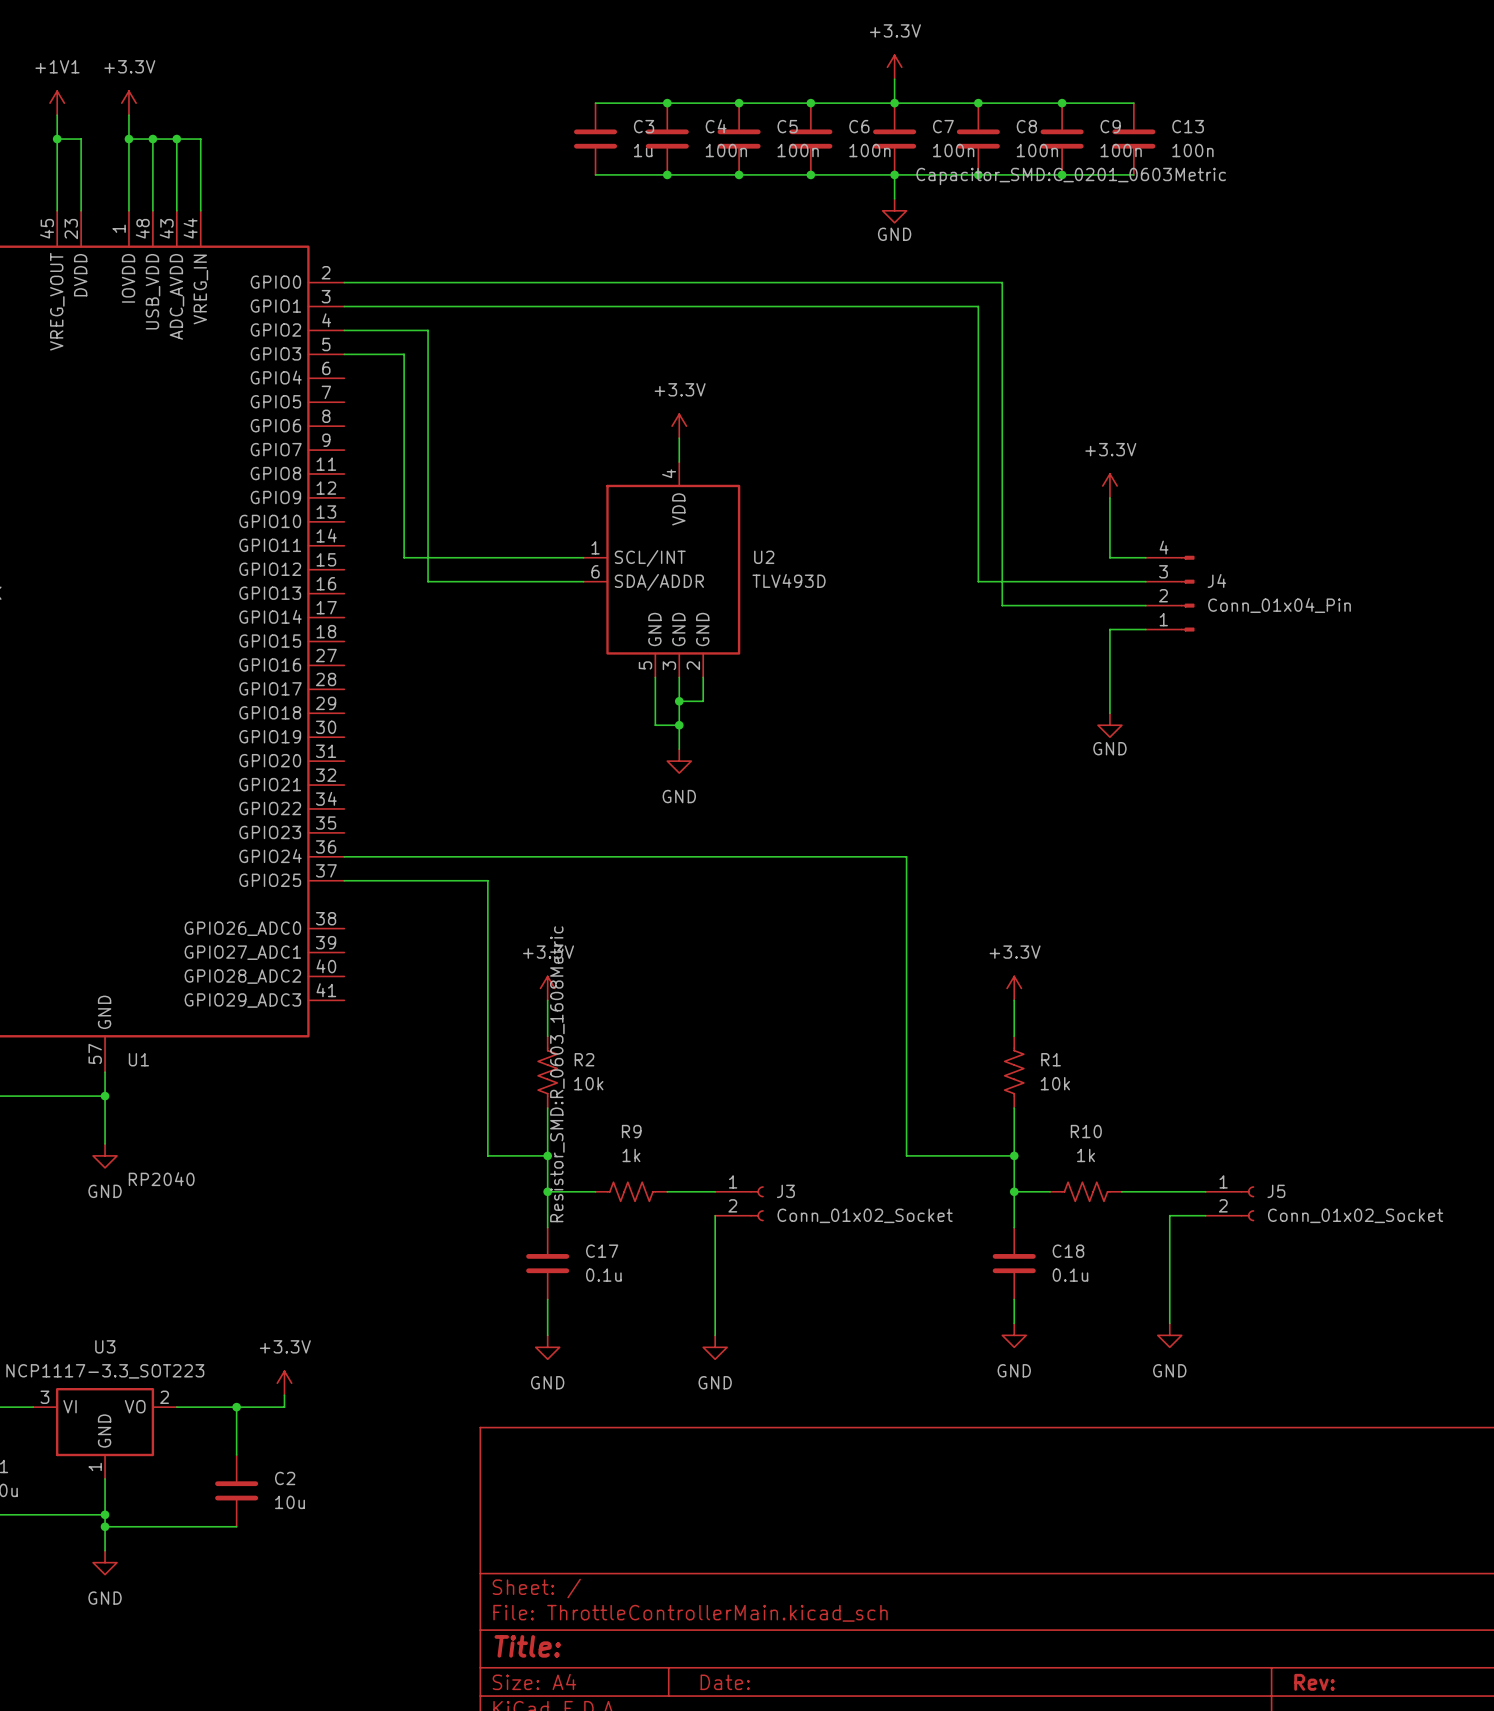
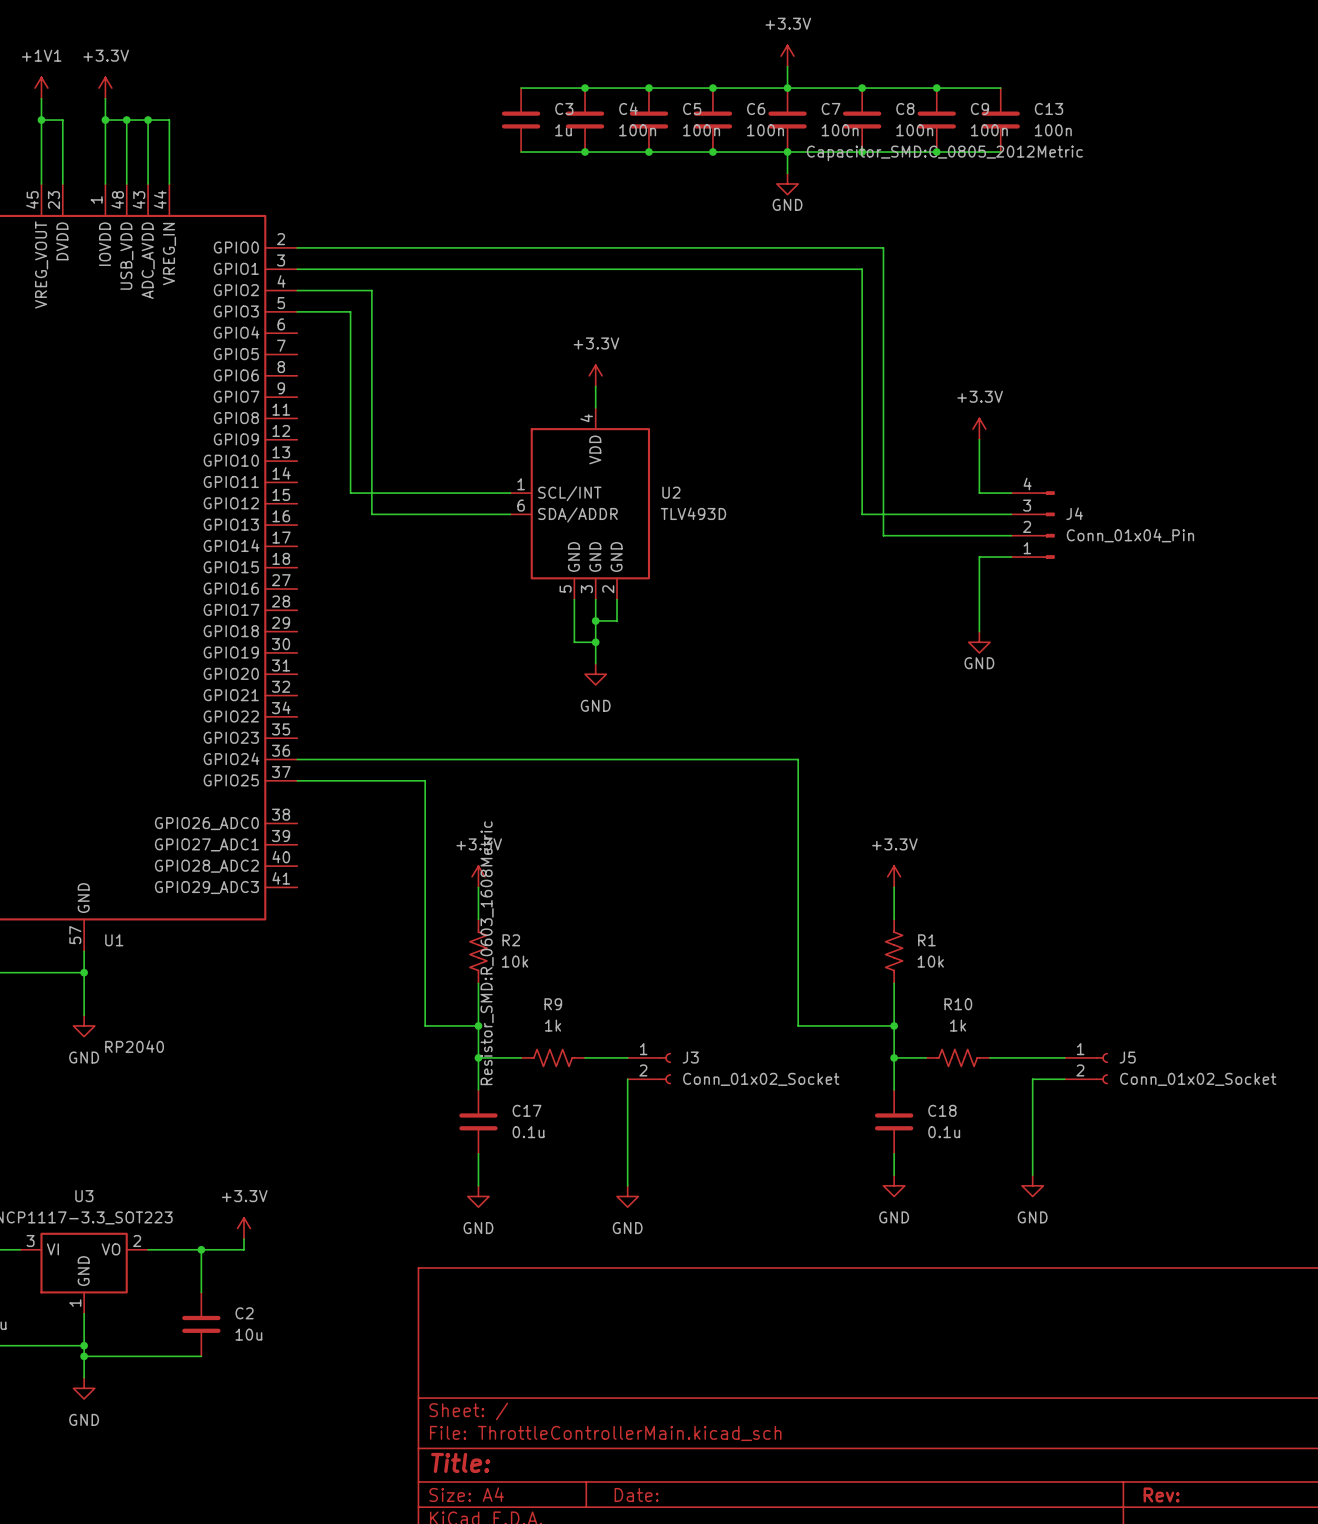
C9 text: Capacitor_SMD:C_0201_0603Metric (1071, 176) -> Capacitor_SMD:C_0805_2012Metric (944, 153)

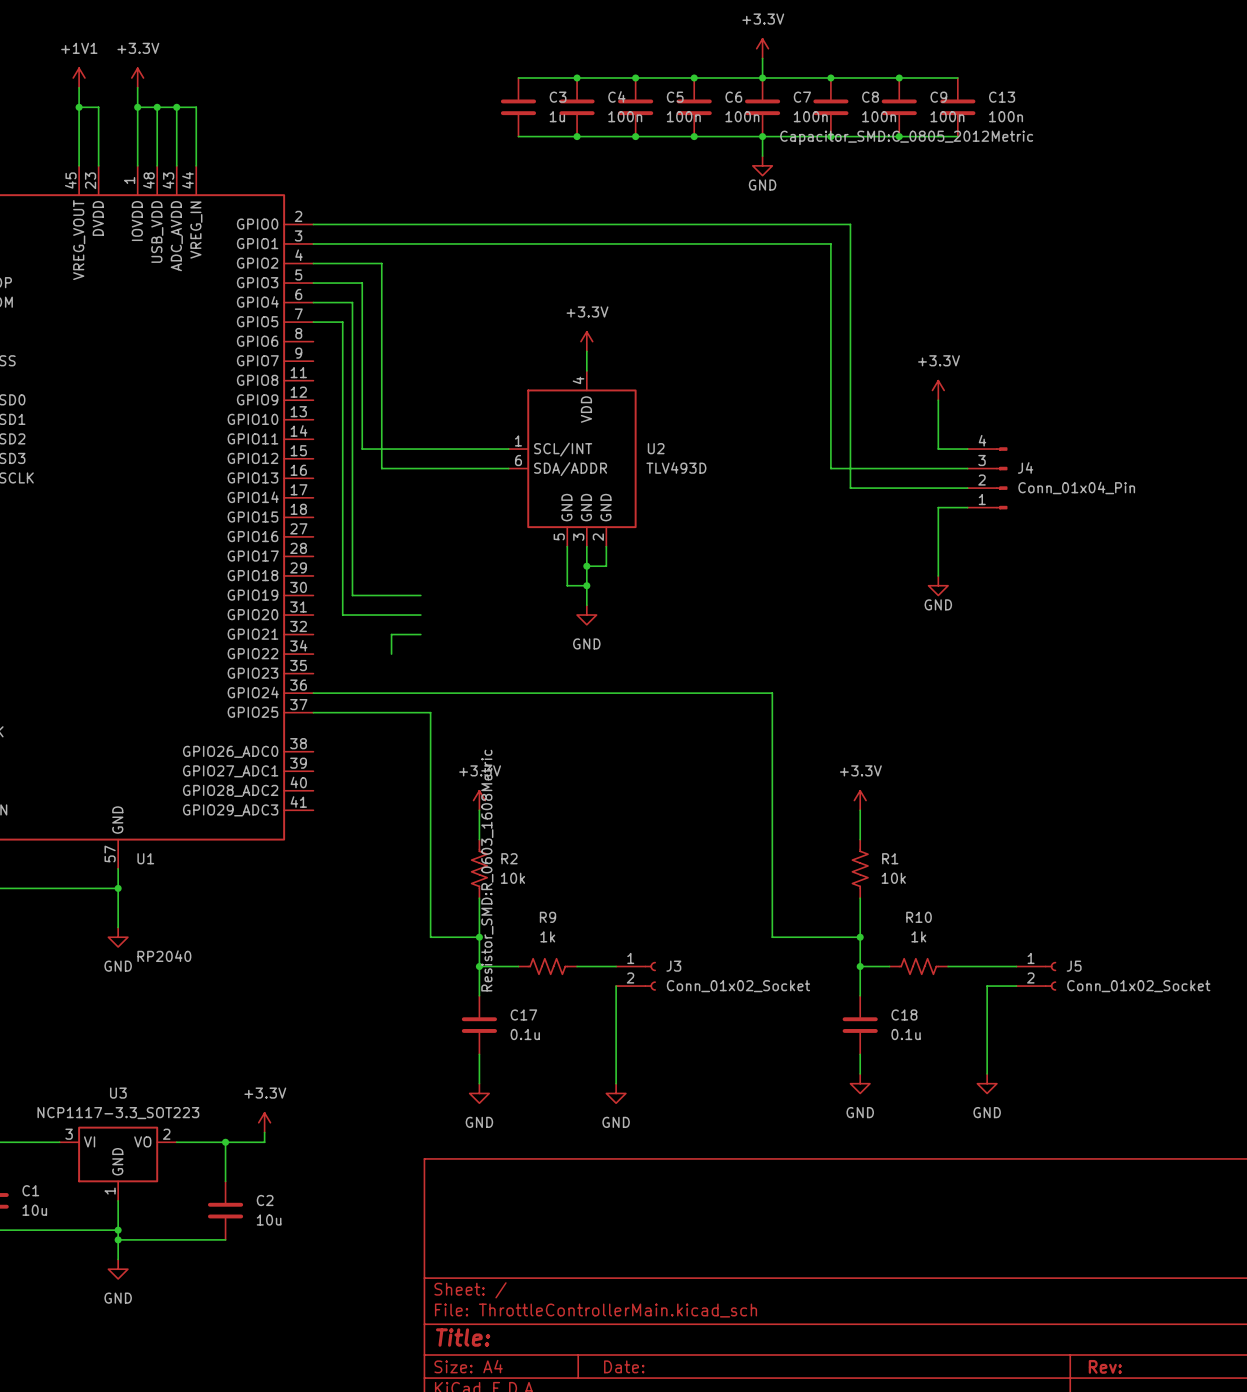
wire: none -> (313, 302) (352, 302) (352, 595) (420, 595)
wire: none -> (313, 322) (342, 322) (342, 615) (420, 615)
wire: none -> (420, 634) (391, 634) (391, 654)

